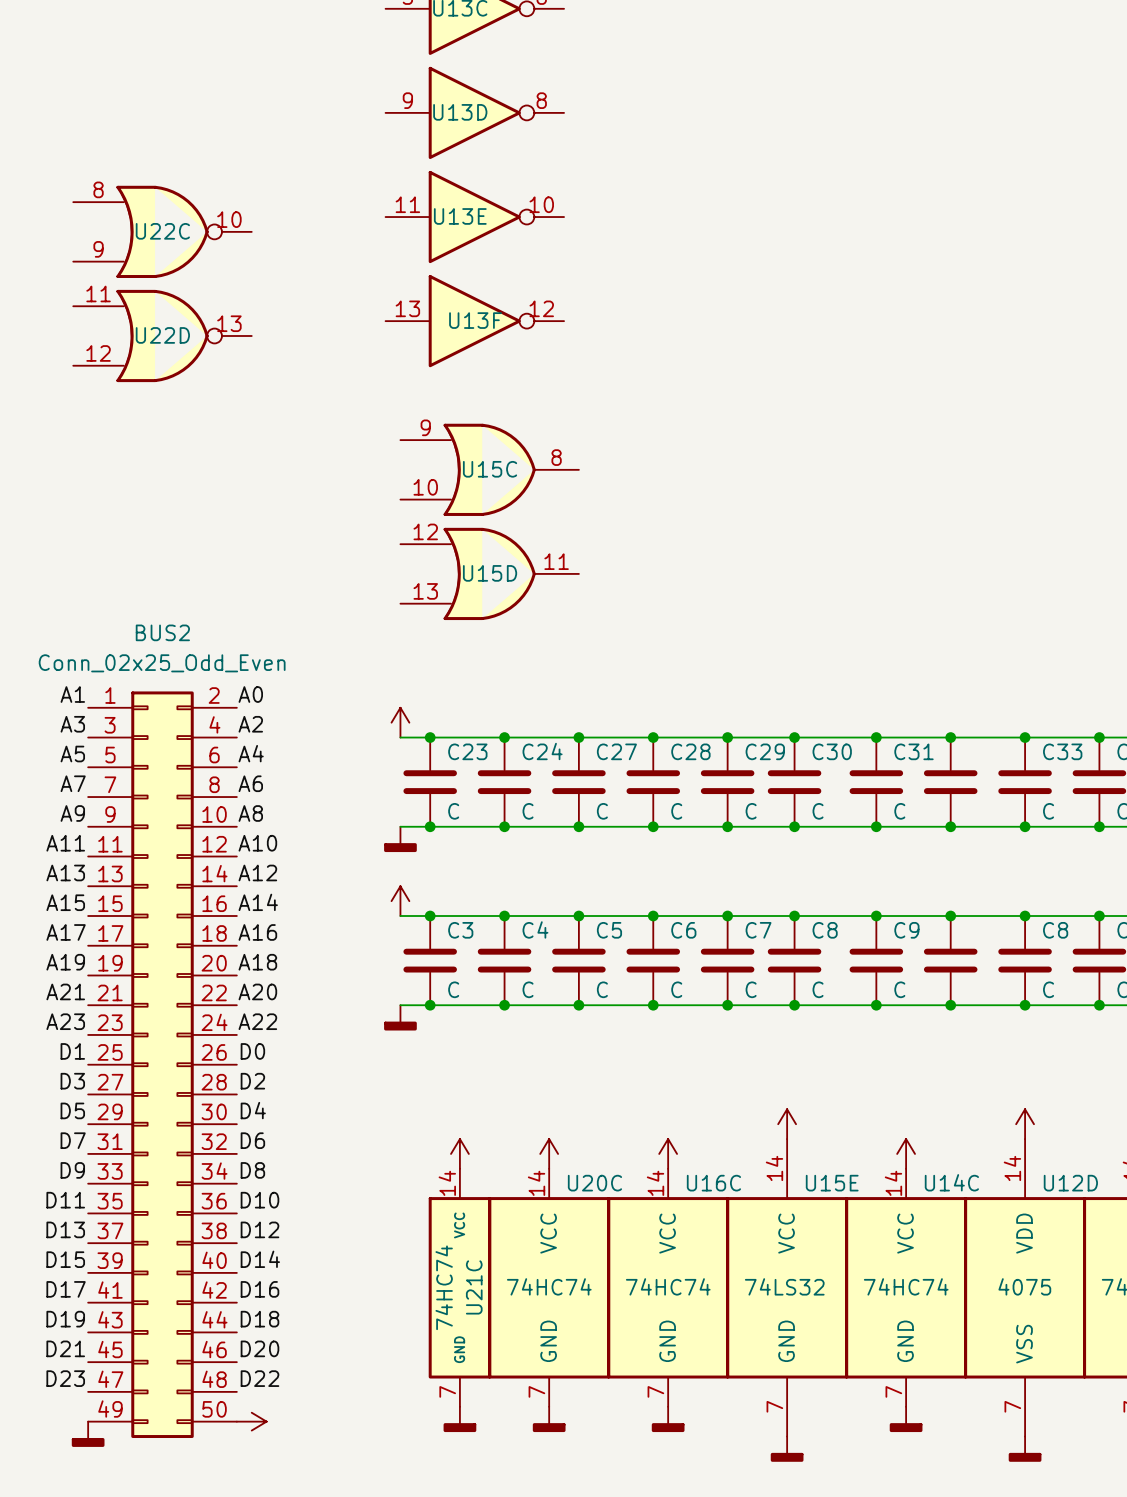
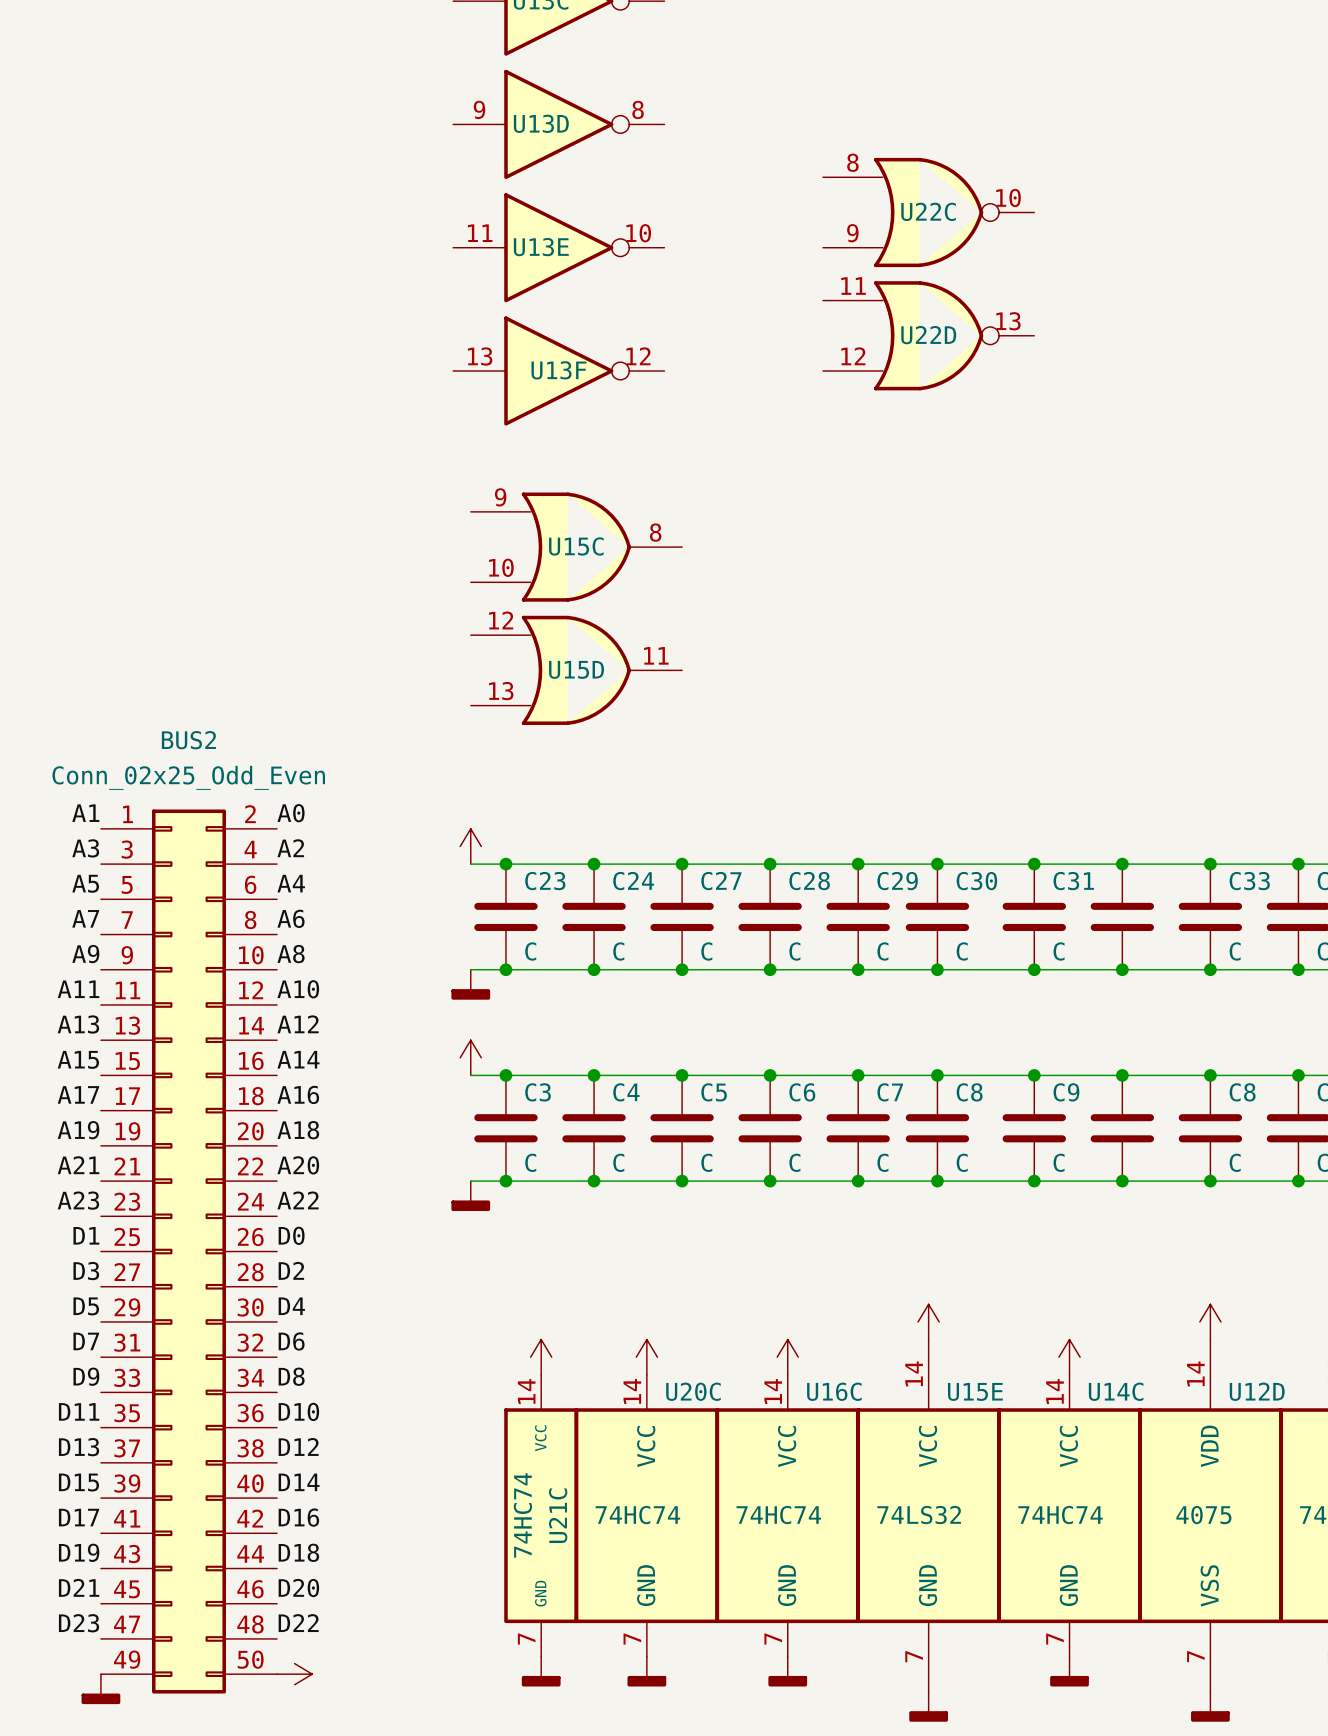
U22C position: (162, 231) -> (928, 212)
U22D position: (162, 335) -> (928, 335)

